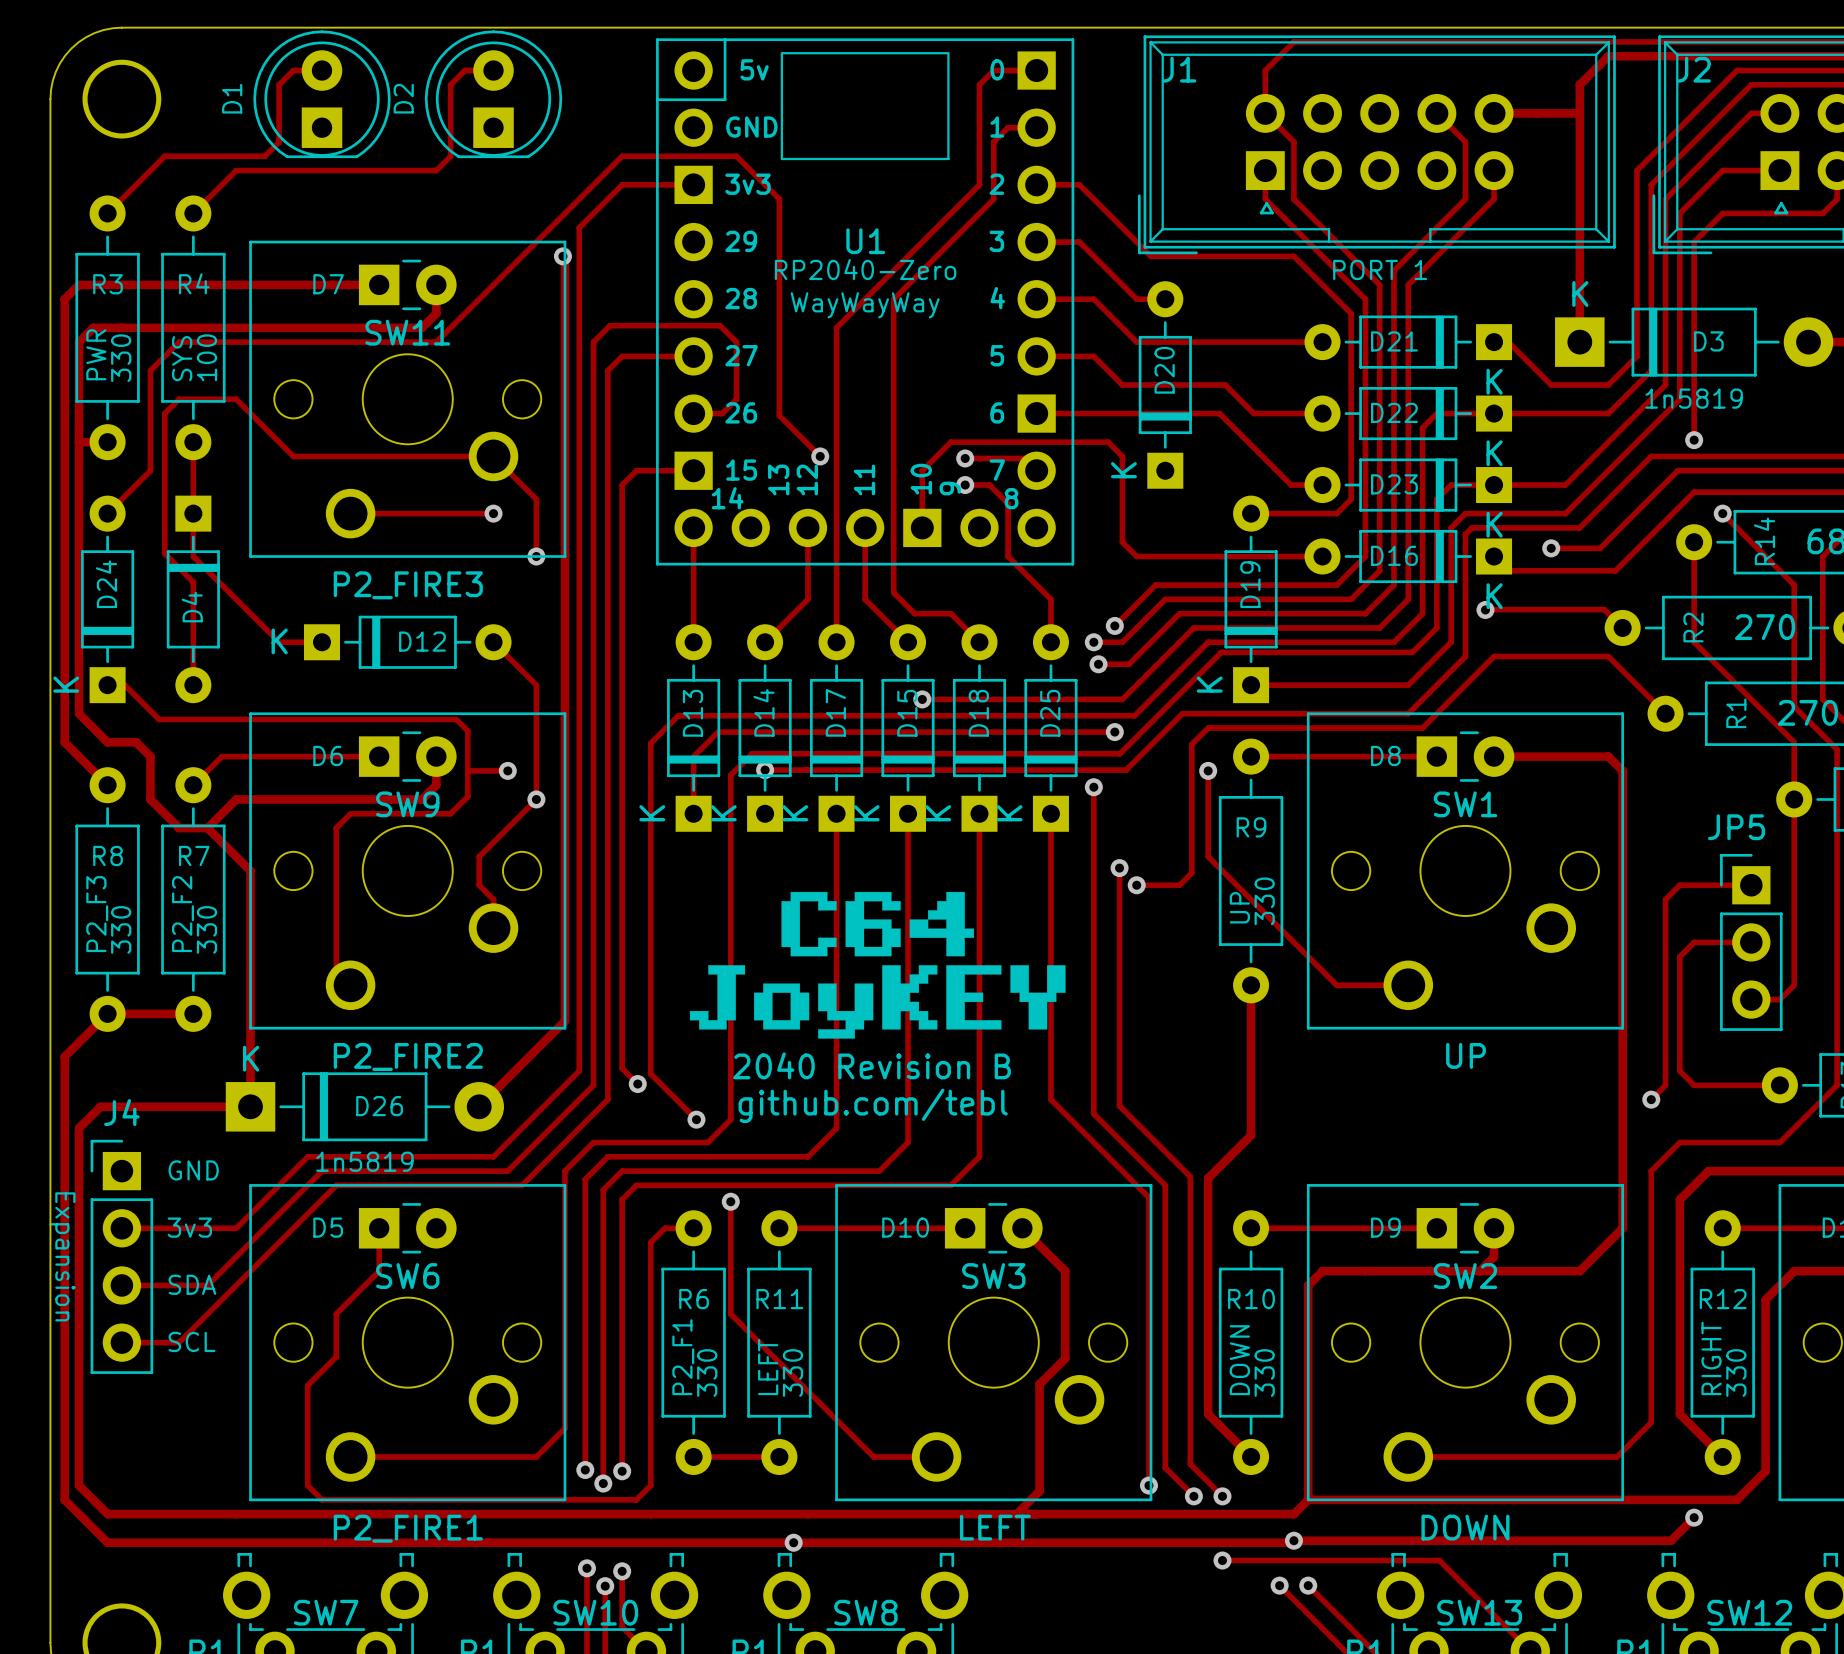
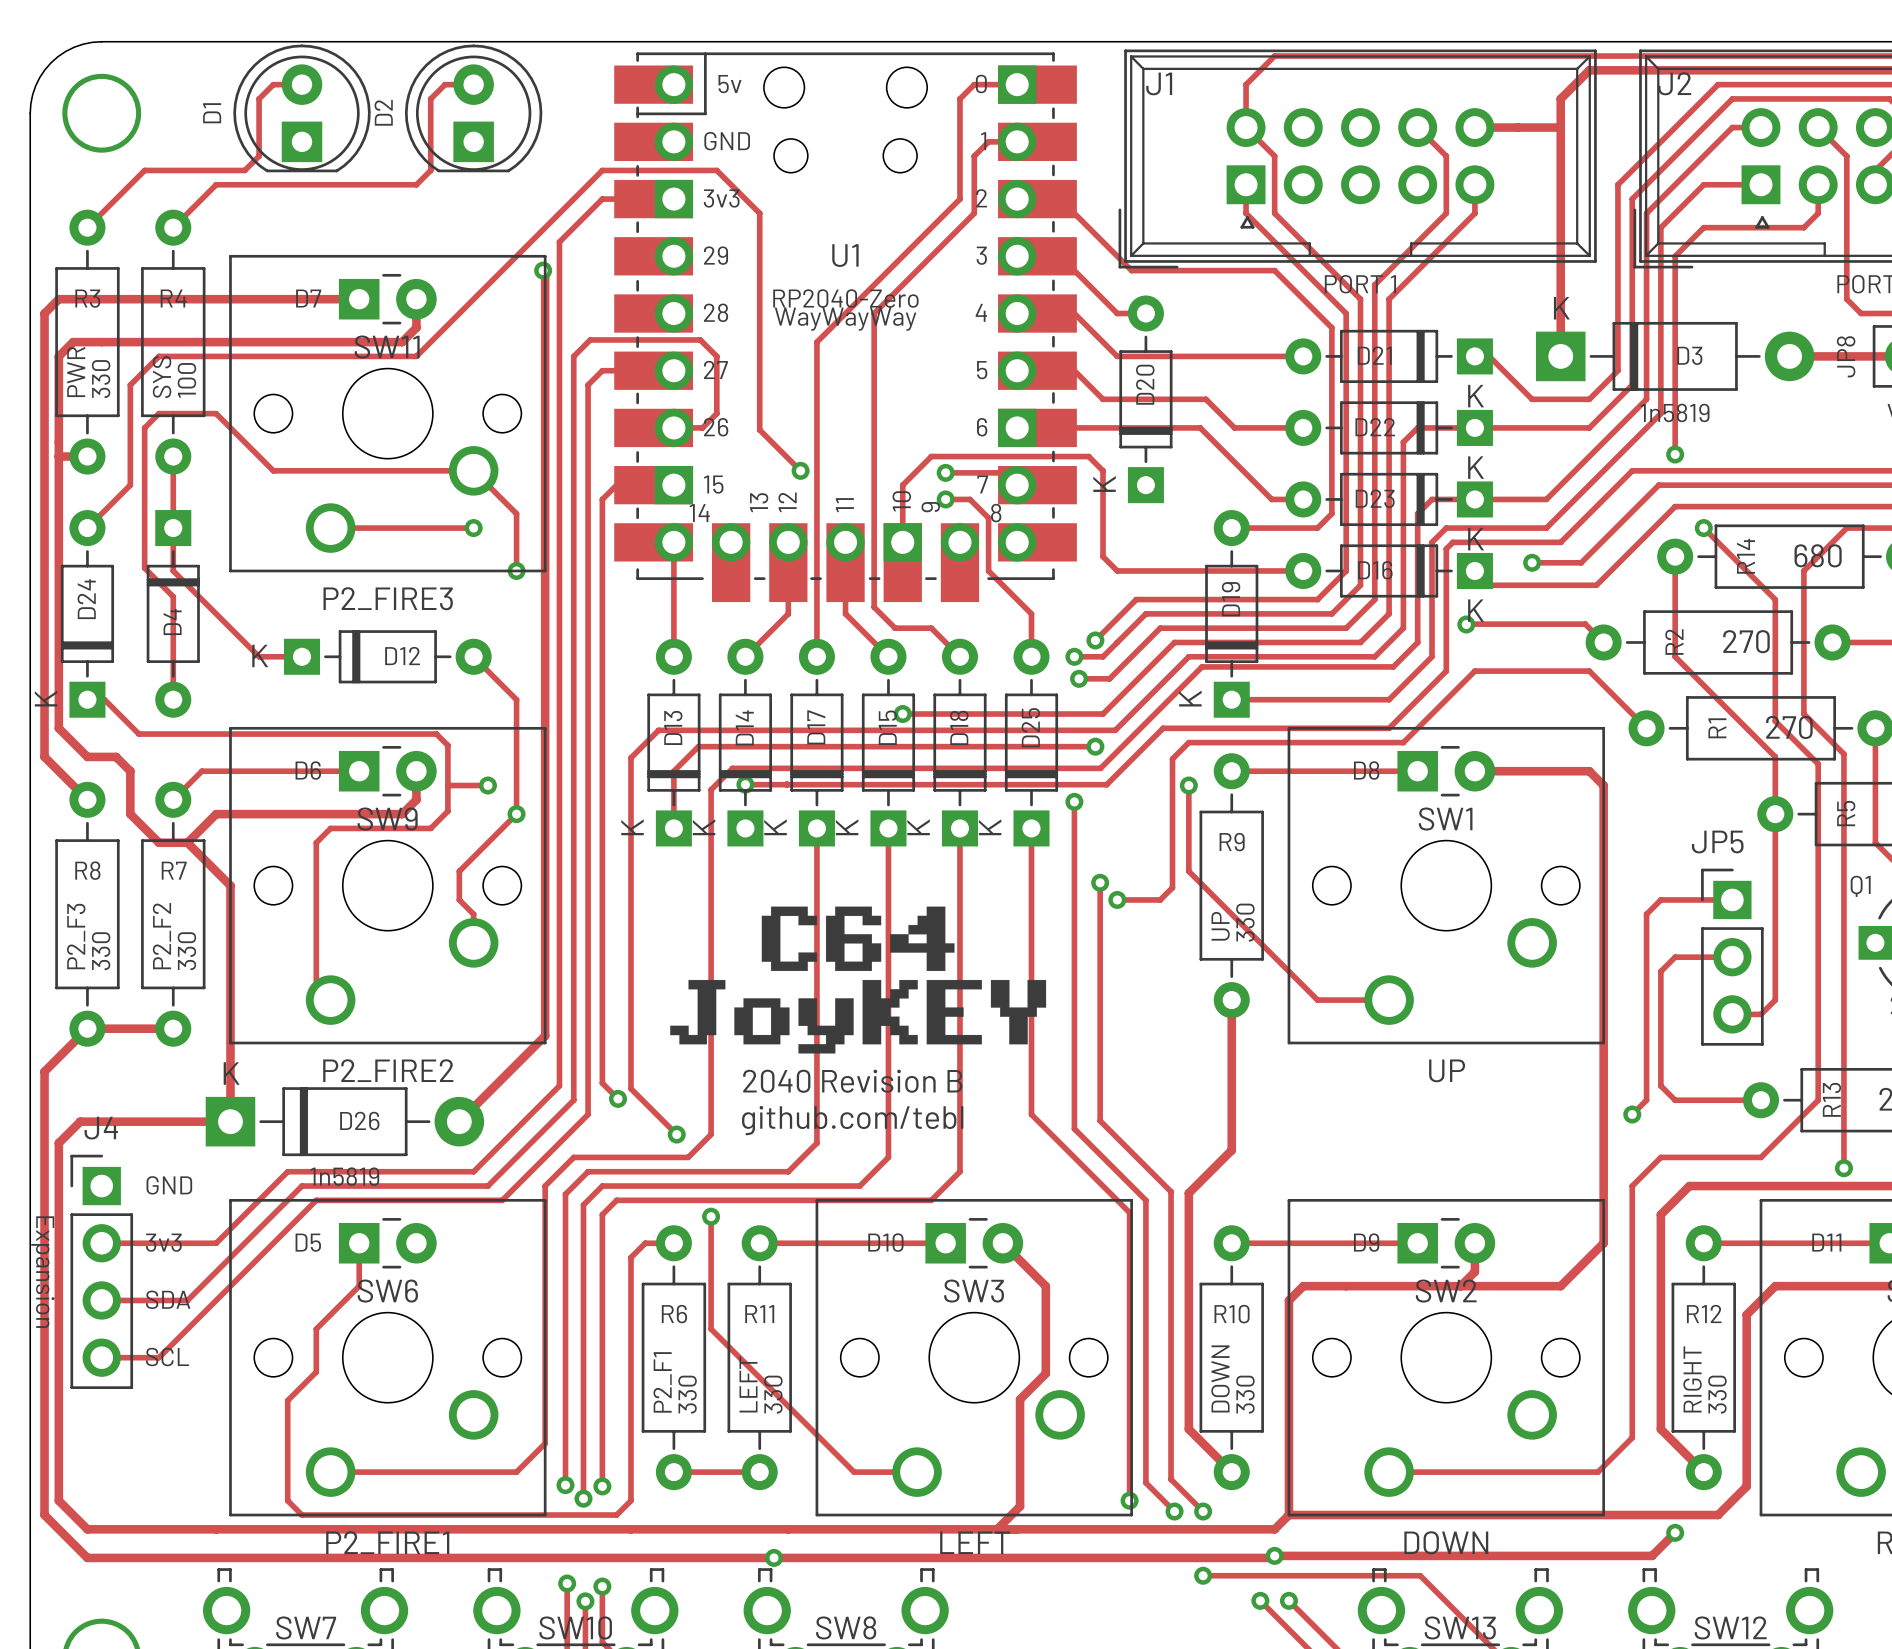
U1 footprint: [656, 38, 1075, 566] -> [614, 52, 1077, 603]

